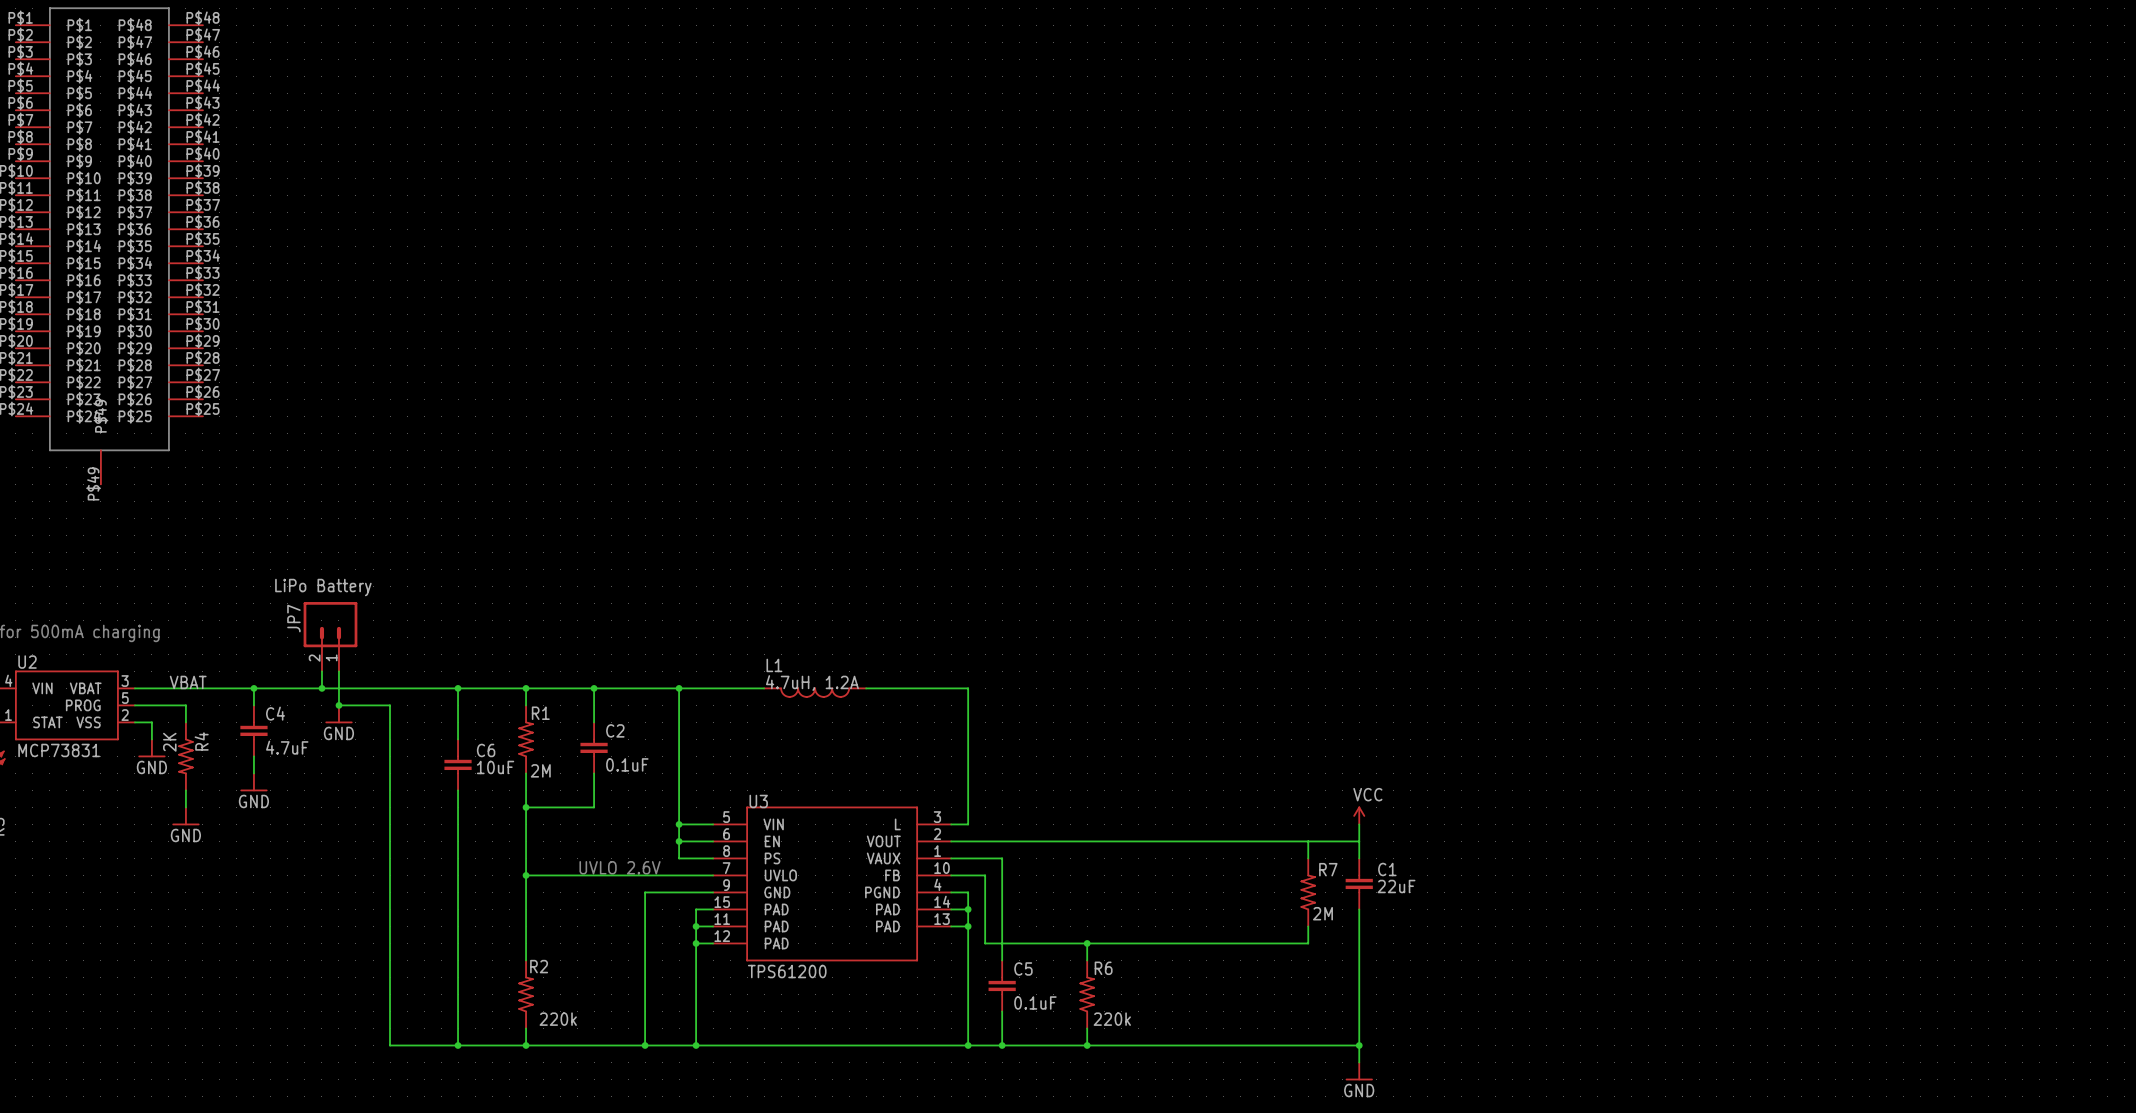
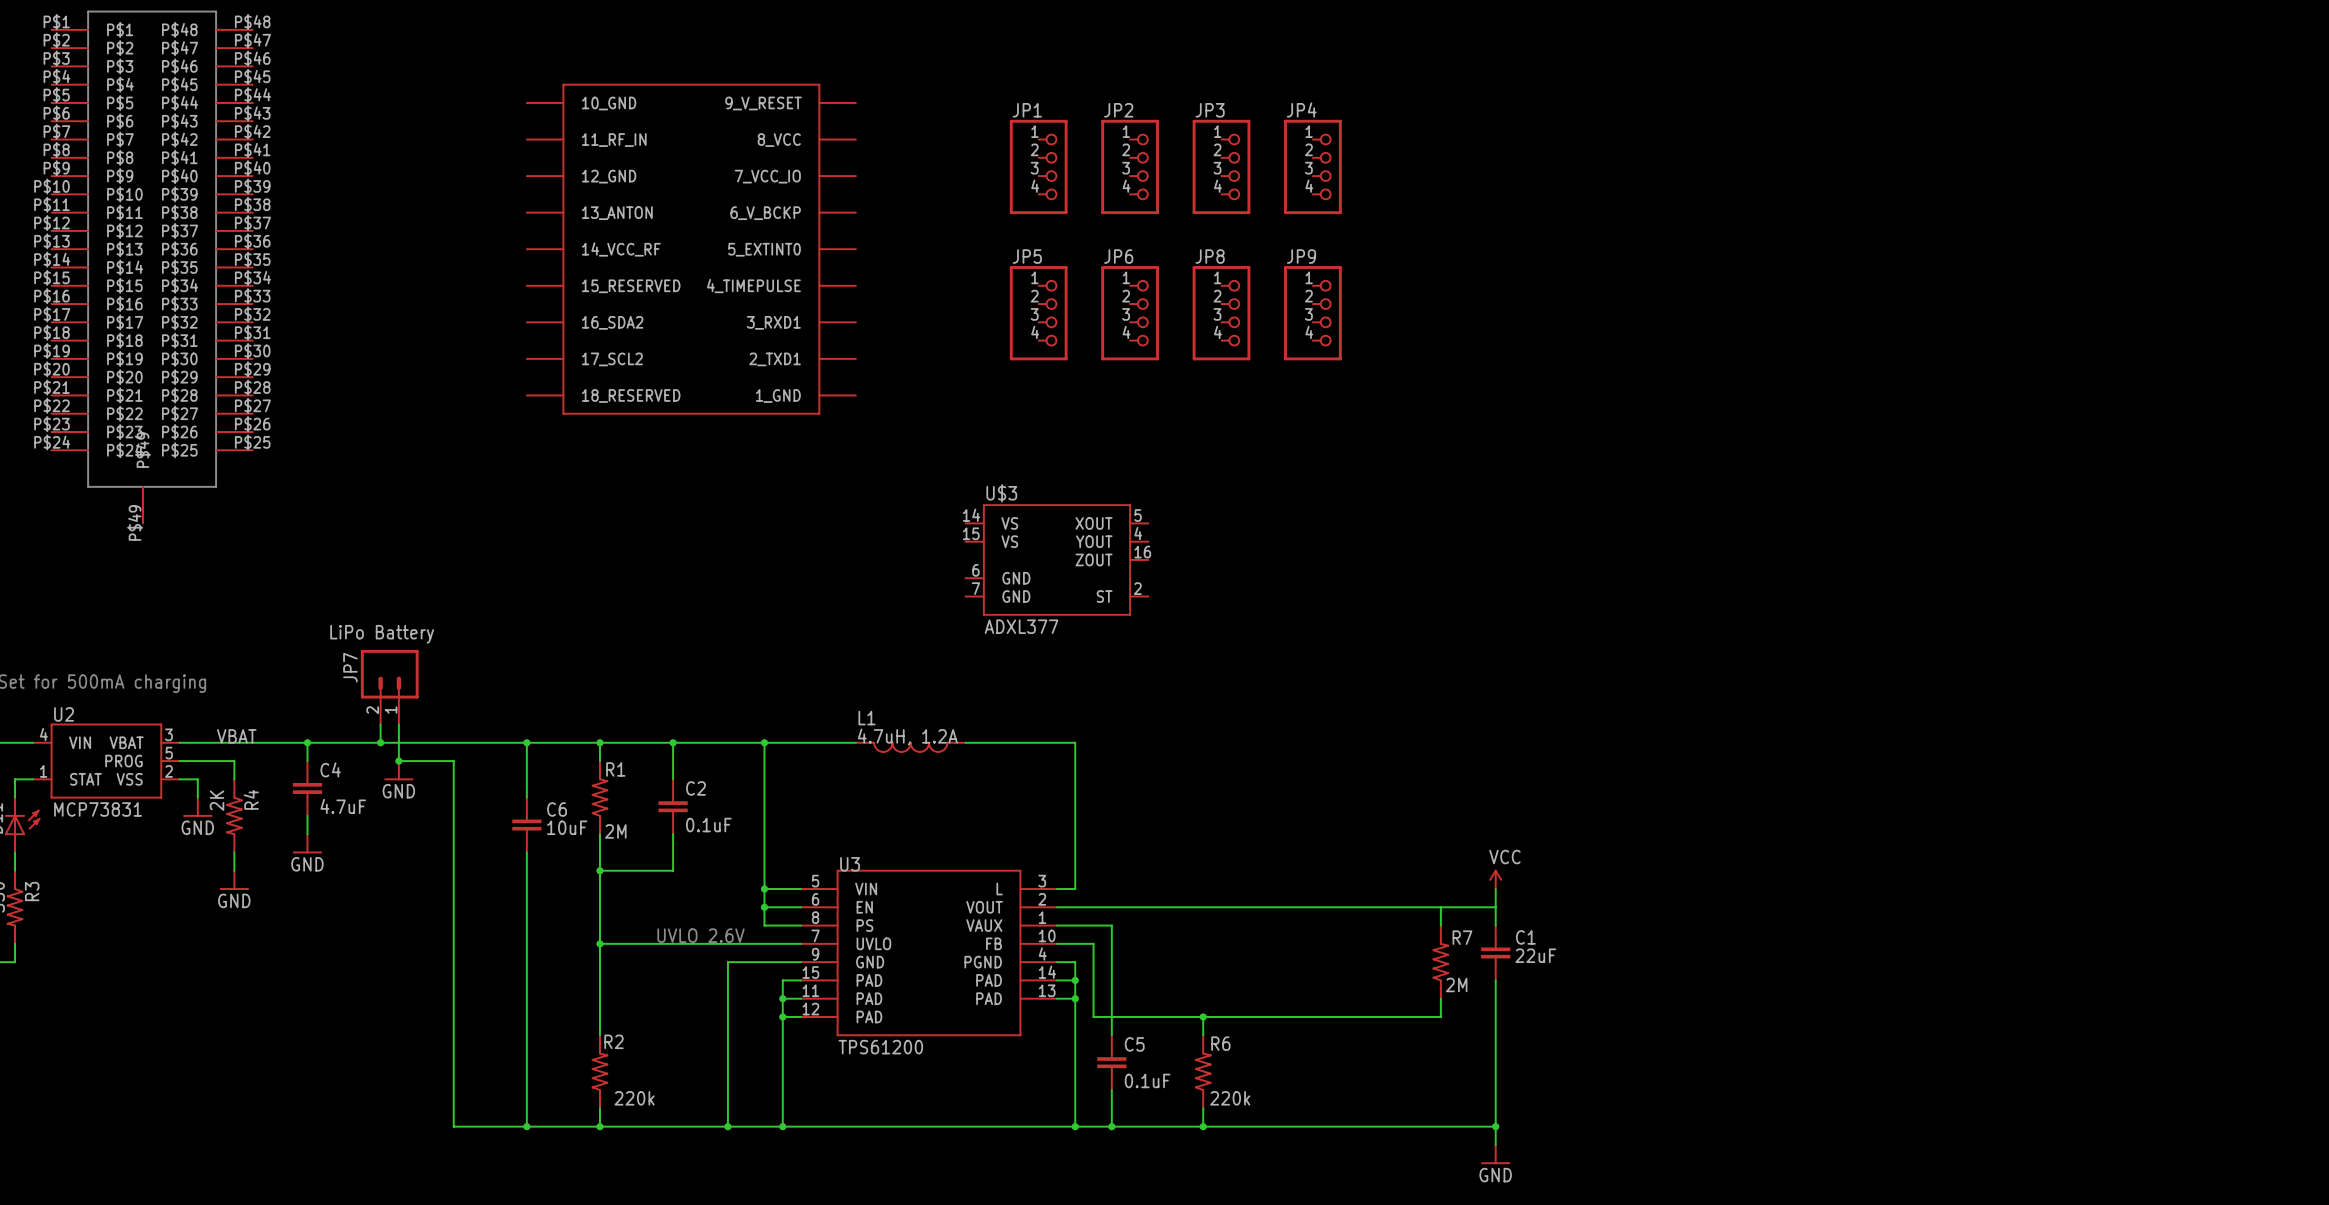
JP1: none -> (1038, 166)
JP2: none -> (1130, 166)
JP3: none -> (1221, 166)
JP4: none -> (1312, 166)
part: none -> (691, 249)
JP5: none -> (1038, 313)
JP6: none -> (1130, 313)
JP8: none -> (1221, 313)
JP9: none -> (1312, 313)
U$3: none -> ADXL377 (1056, 559)

